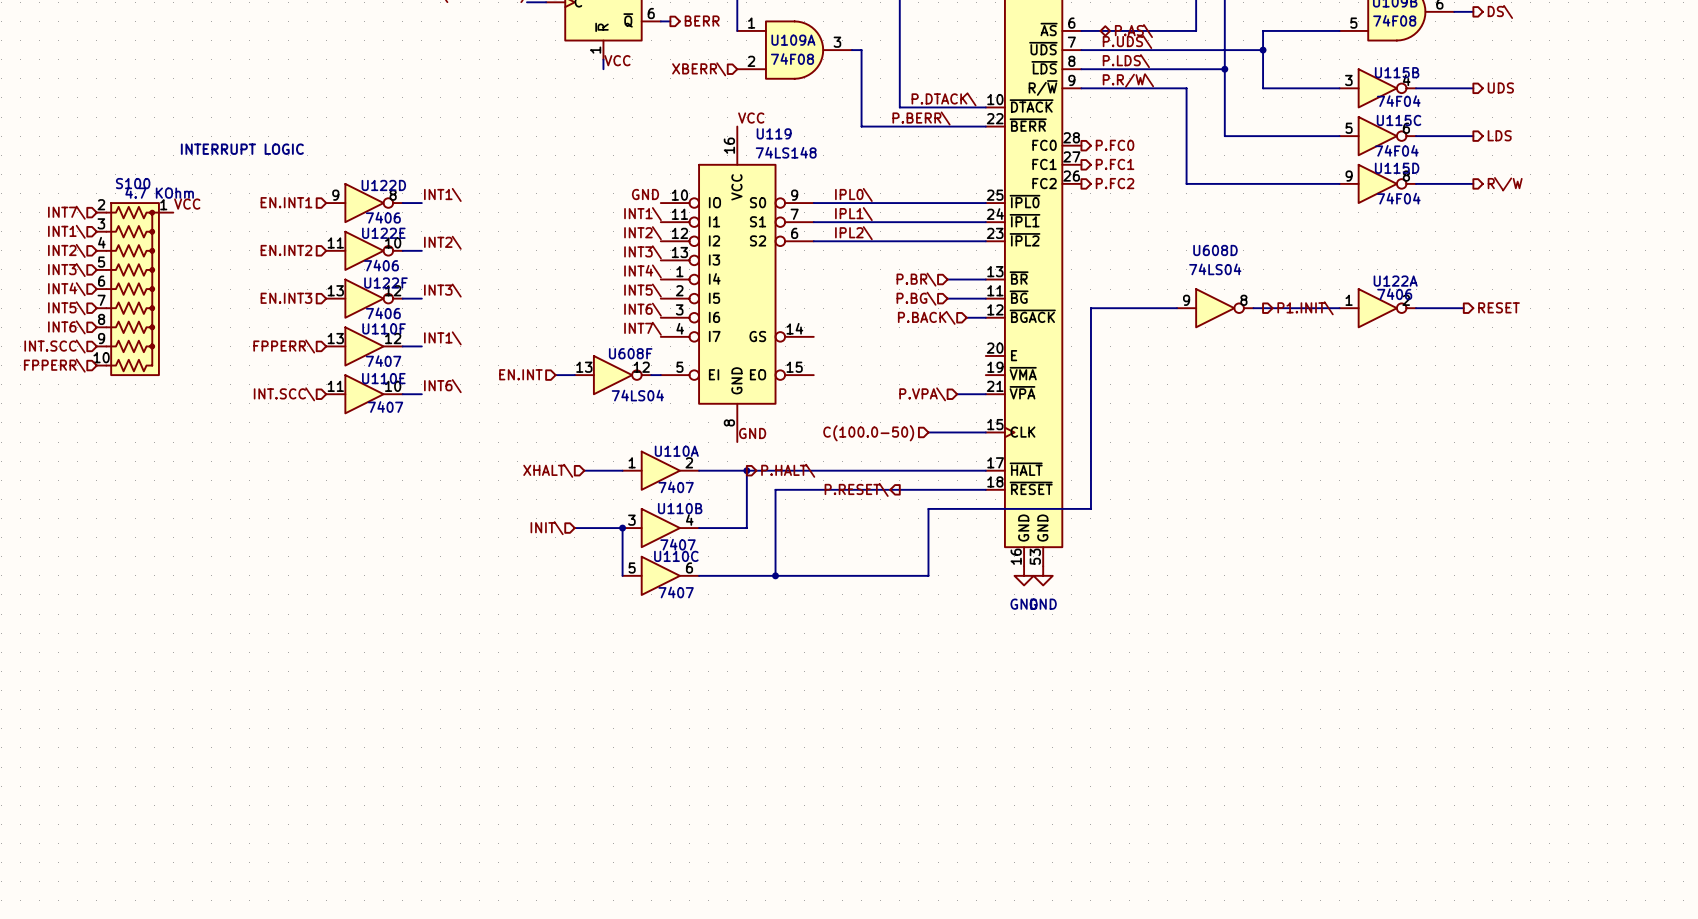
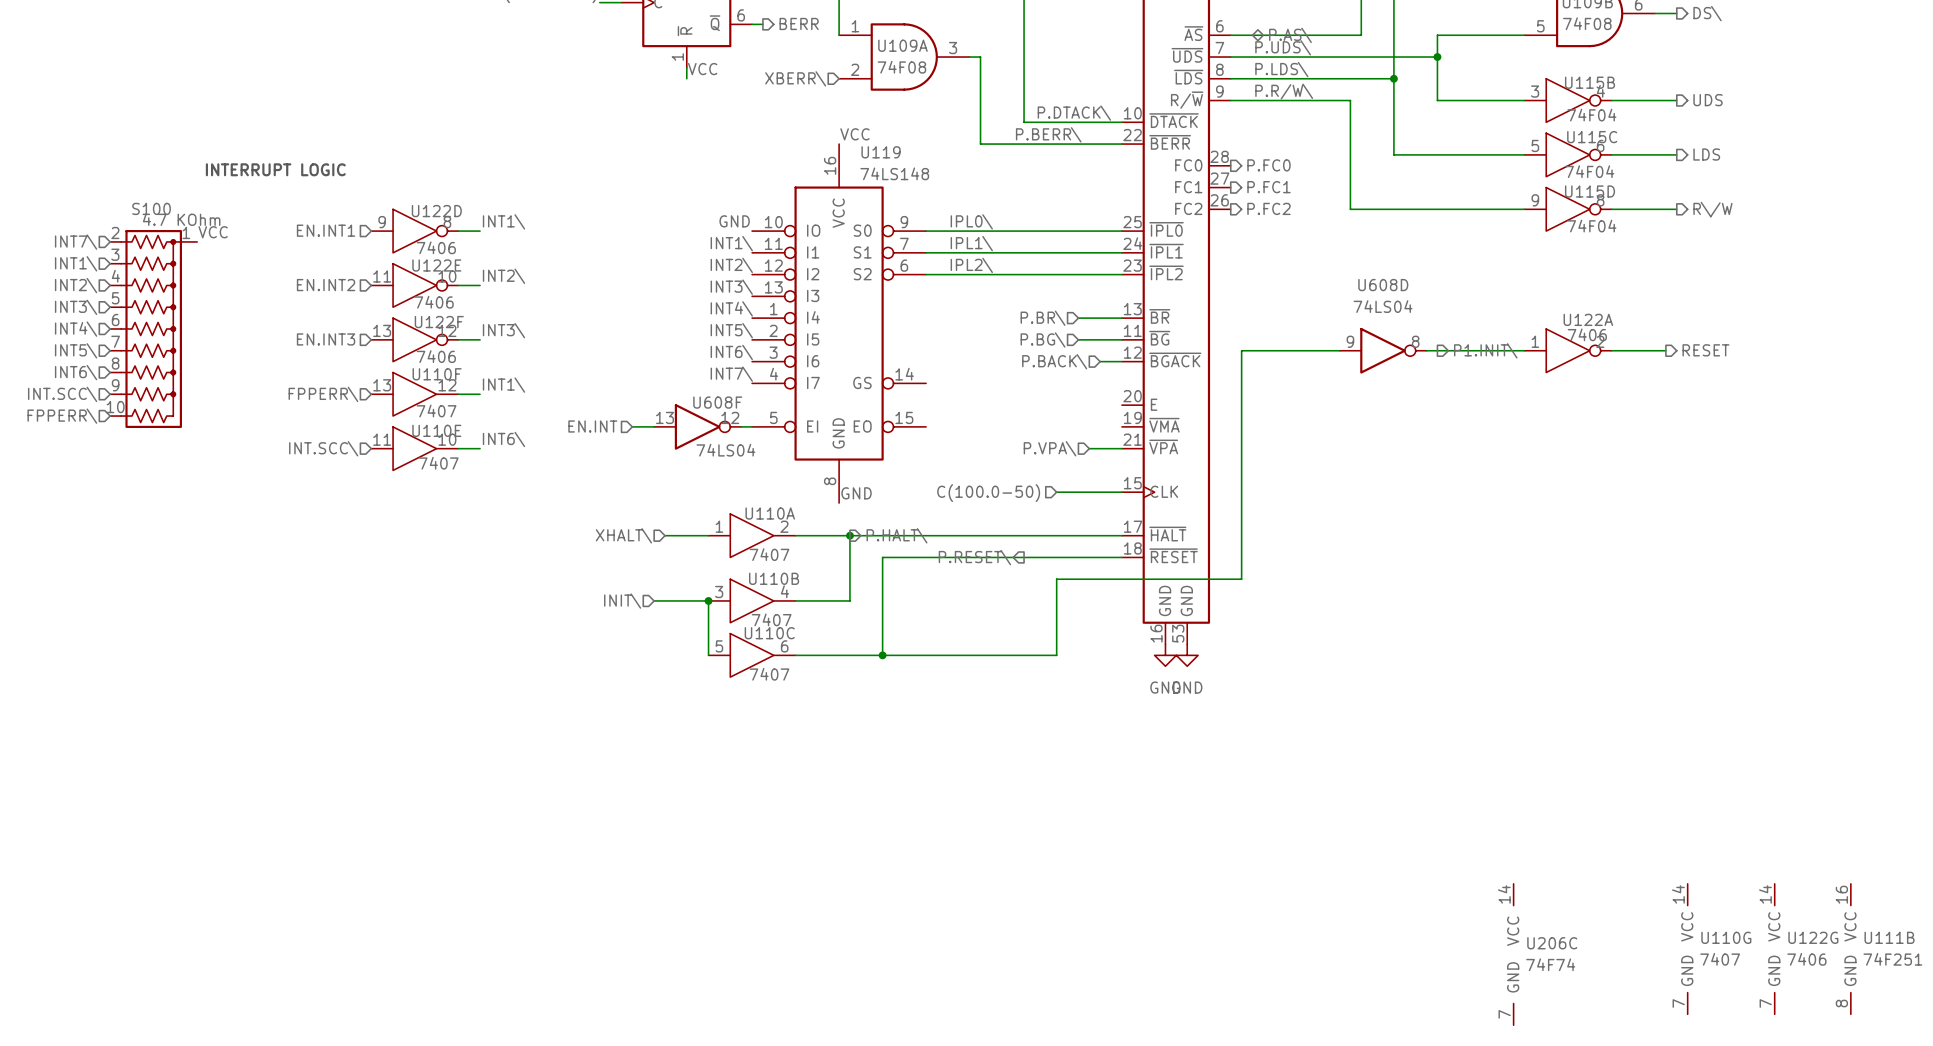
U110G: none -> 7407 (1687, 949)
U122G: none -> 7406 (1774, 949)
U111B: none -> 74F251 (1850, 949)
U206C: none -> 74F74 (1513, 954)

